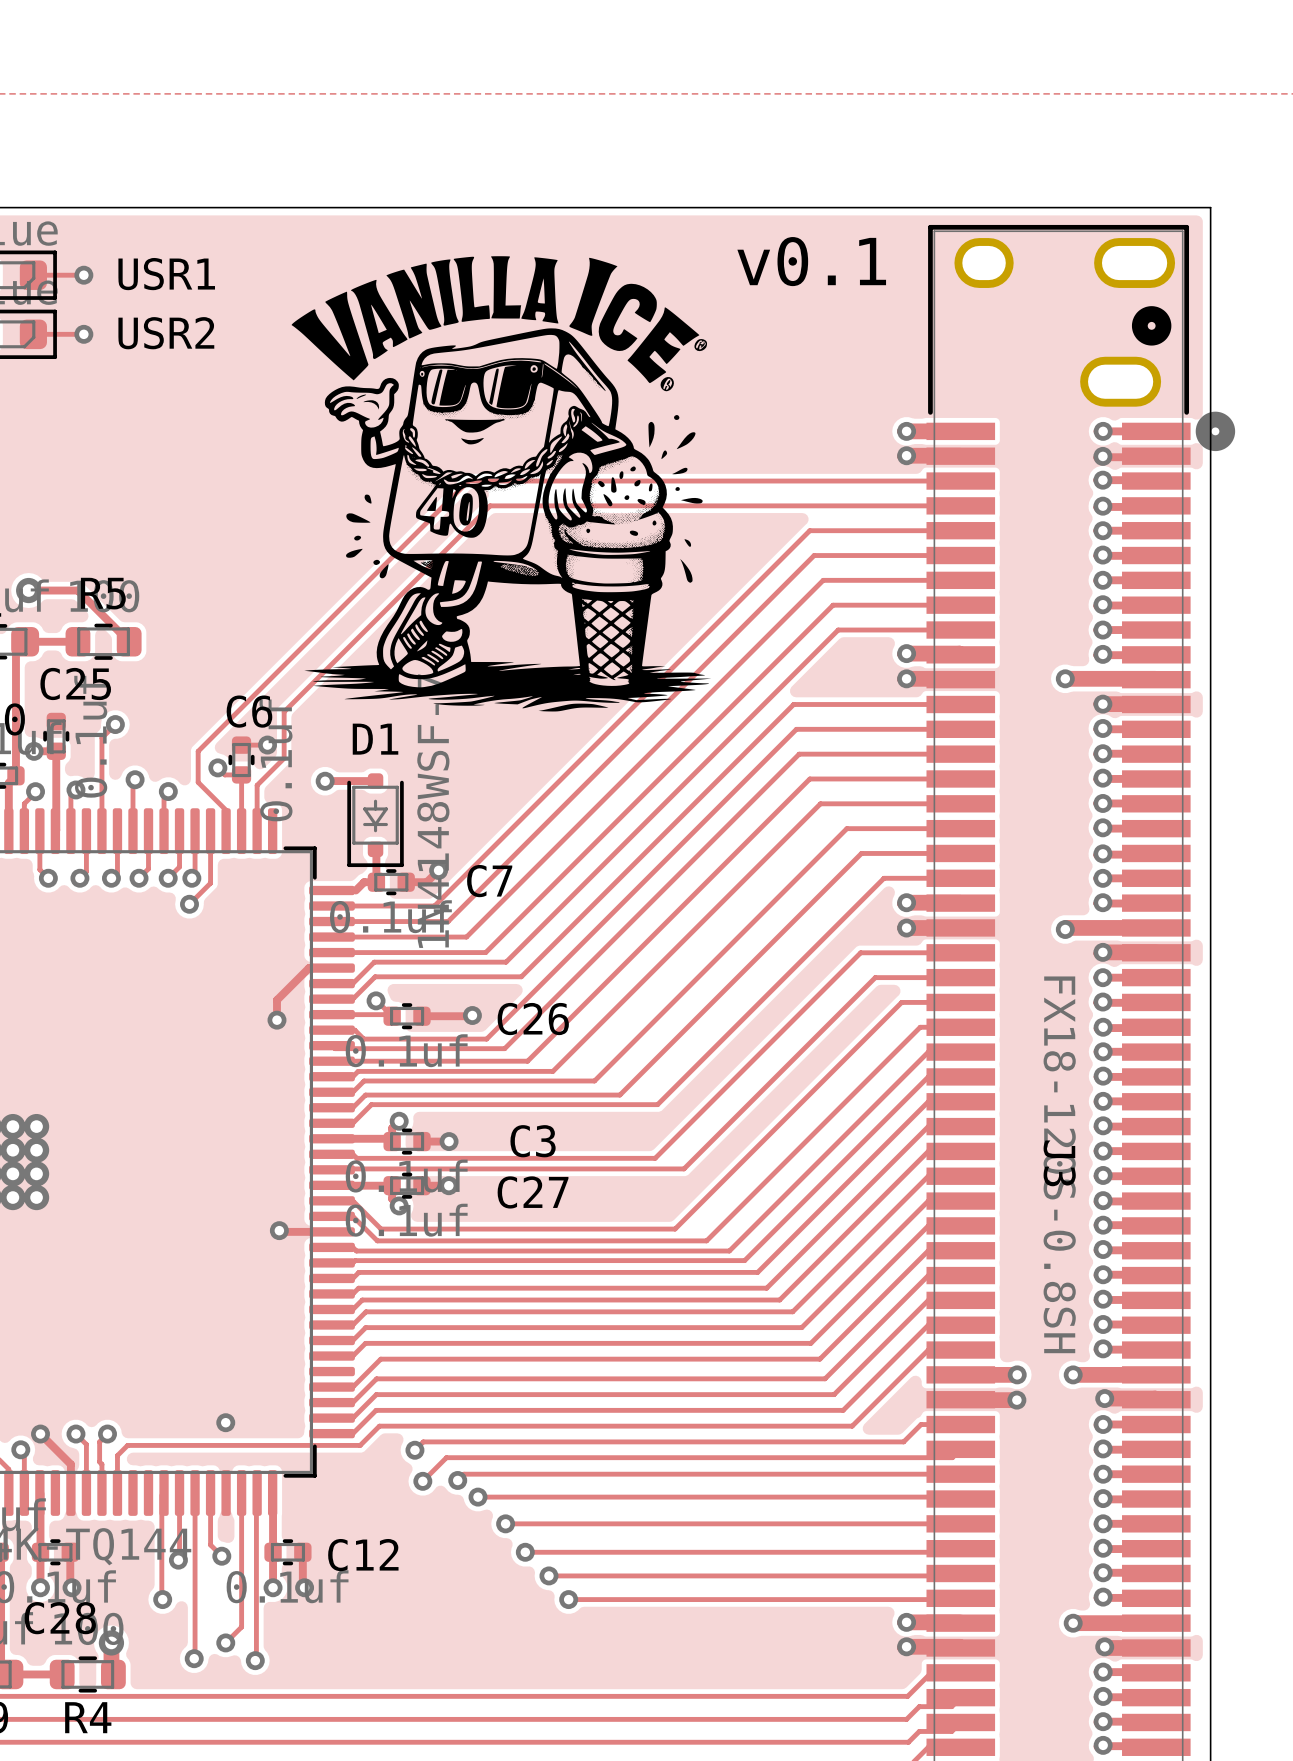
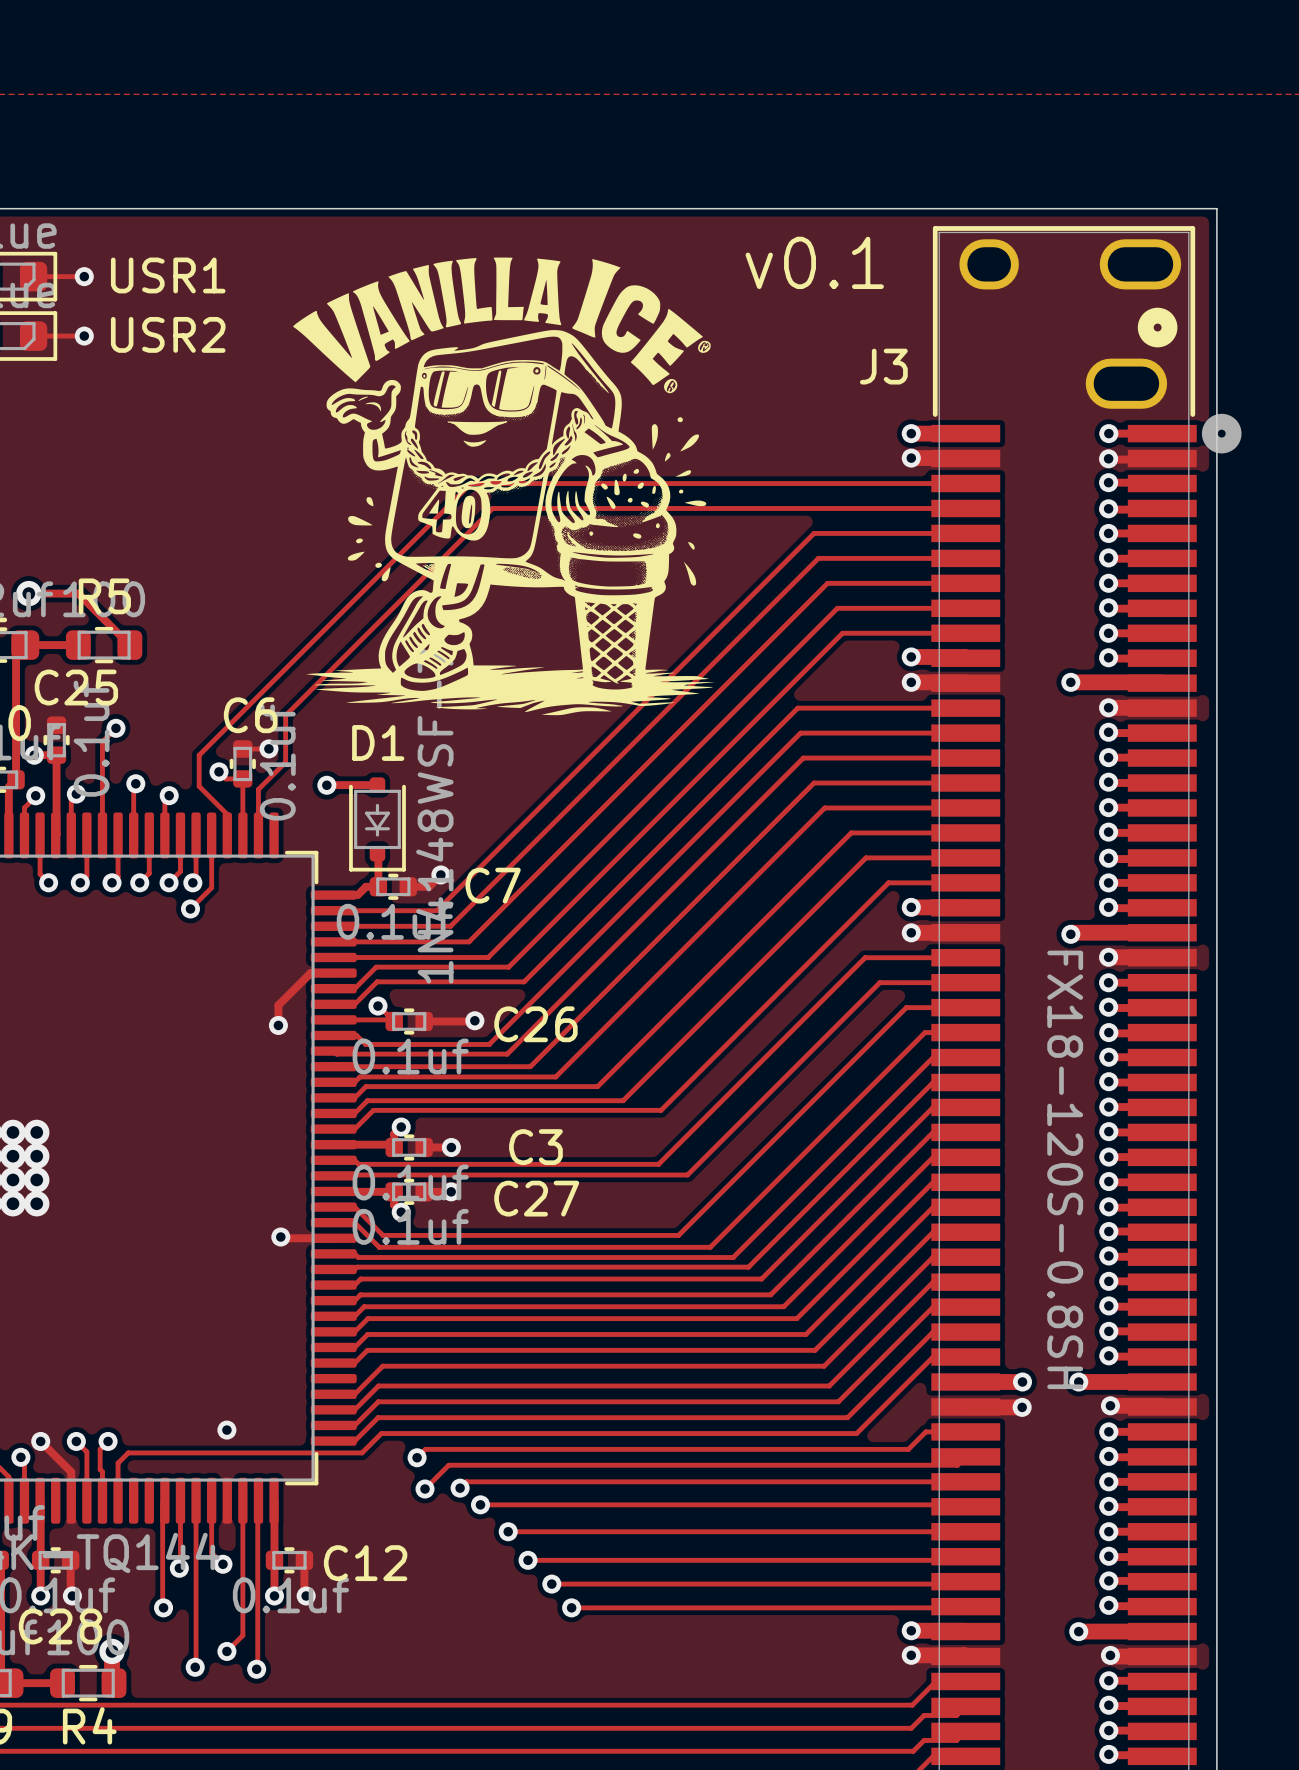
J3 name rotation: 0° (1059, 1163) -> 90° counterclockwise (883, 366)
J3 name position: J3 (1059, 1163) -> J3 (883, 366)

